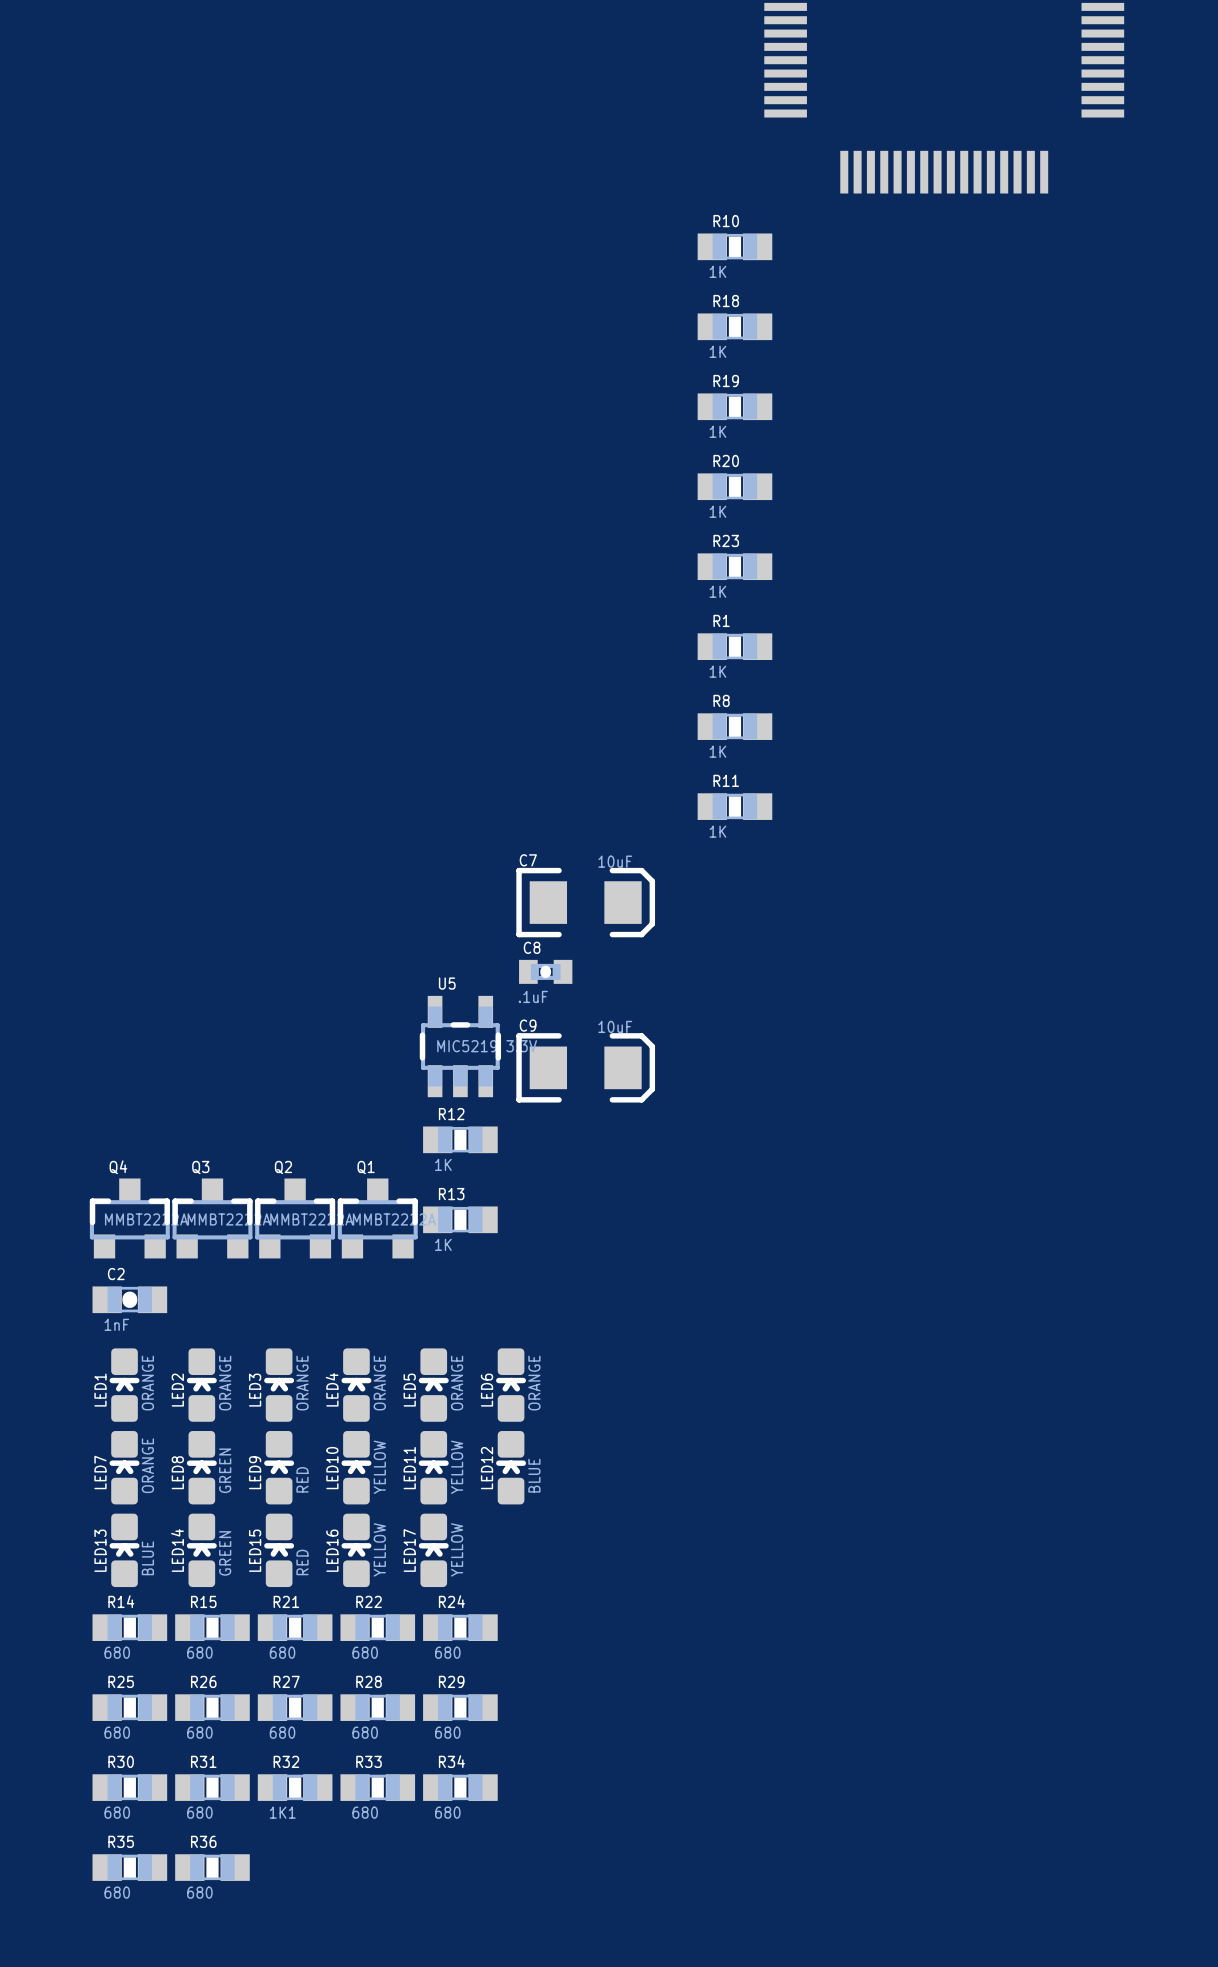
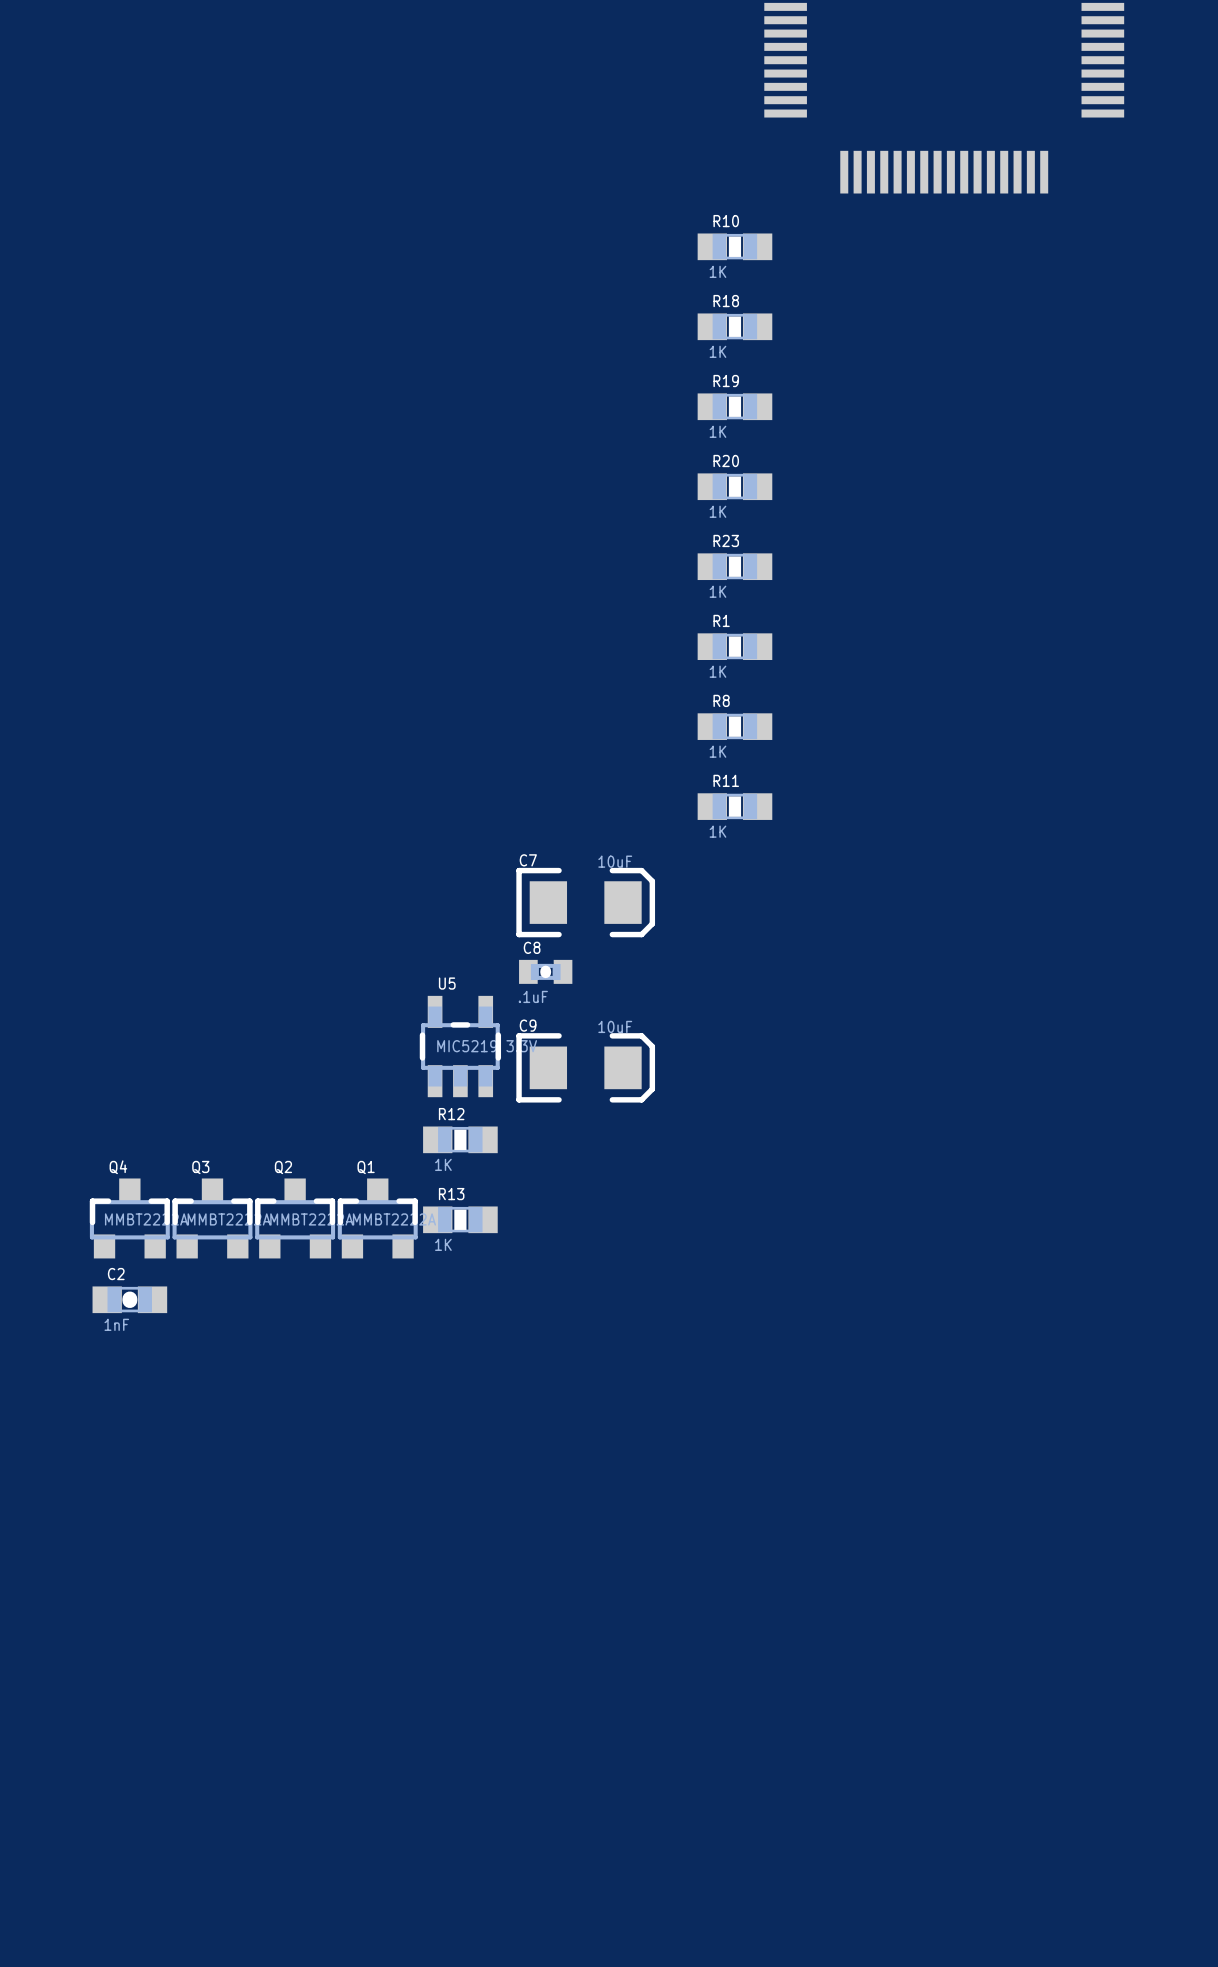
LED1: ORANGE (124, 1385) -> none
LED2: ORANGE (201, 1385) -> none
LED3: ORANGE (279, 1385) -> none
LED4: ORANGE (356, 1385) -> none
LED5: ORANGE (433, 1385) -> none
LED6: ORANGE (511, 1385) -> none
LED7: ORANGE (124, 1467) -> none
LED8: GREEN (201, 1467) -> none
LED9: RED (279, 1467) -> none
LED10: YELLOW (356, 1467) -> none
LED11: YELLOW (433, 1467) -> none
LED12: BLUE (511, 1467) -> none
LED13: BLUE (124, 1550) -> none
LED14: GREEN (201, 1550) -> none
LED15: RED (279, 1550) -> none
LED16: YELLOW (356, 1550) -> none
LED17: YELLOW (433, 1550) -> none
R14: 680 (129, 1627) -> none
R15: 680 (212, 1627) -> none
R21: 680 (295, 1627) -> none
R22: 680 (377, 1627) -> none
R24: 680 (460, 1627) -> none
R25: 680 (129, 1707) -> none
R26: 680 (212, 1707) -> none
R27: 680 (295, 1707) -> none
R28: 680 (377, 1707) -> none
R29: 680 (460, 1707) -> none
R30: 680 (129, 1787) -> none
R31: 680 (212, 1787) -> none
R32: 1K1 (295, 1787) -> none
R33: 680 (377, 1787) -> none
R34: 680 (460, 1787) -> none
R35: 680 (129, 1867) -> none
R36: 680 (212, 1867) -> none

